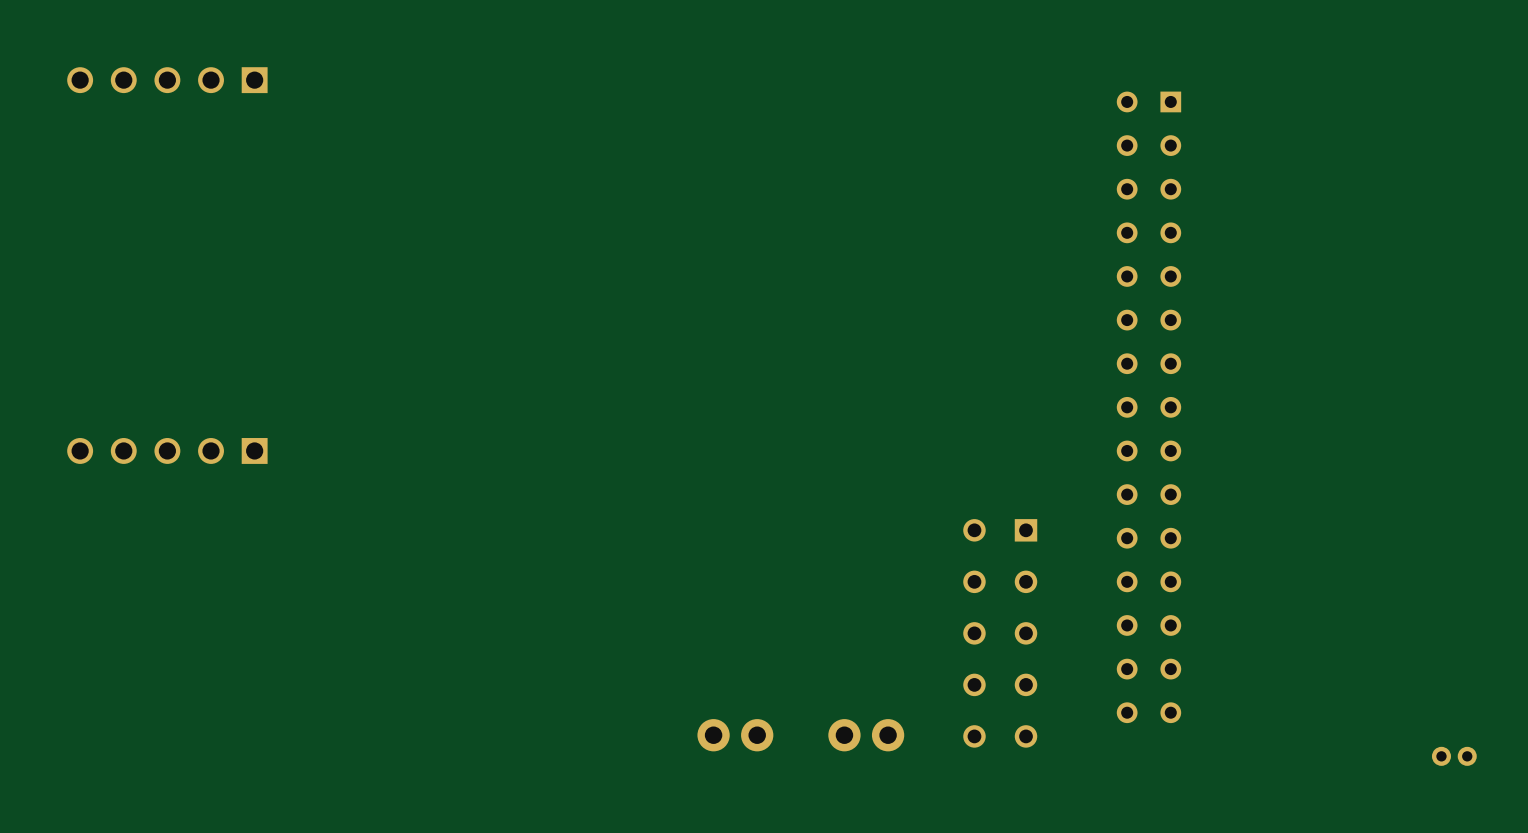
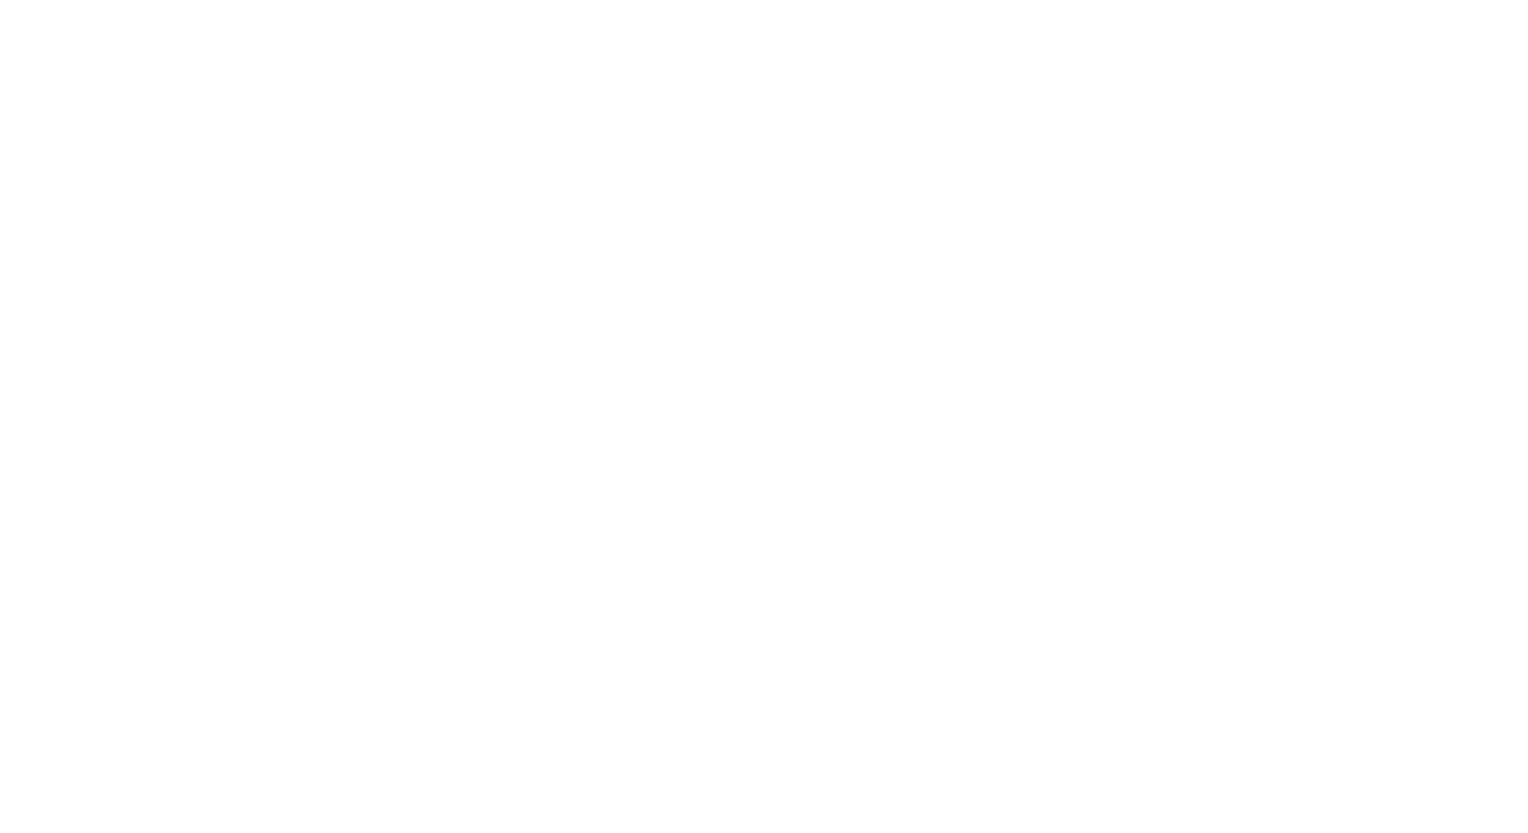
part: (167, 80) -> none
part: (1148, 407) -> none
part: (167, 450) -> none
part: (1000, 633) -> none
part: (735, 735) -> none
part: (866, 735) -> none
part: (1454, 756) -> none

